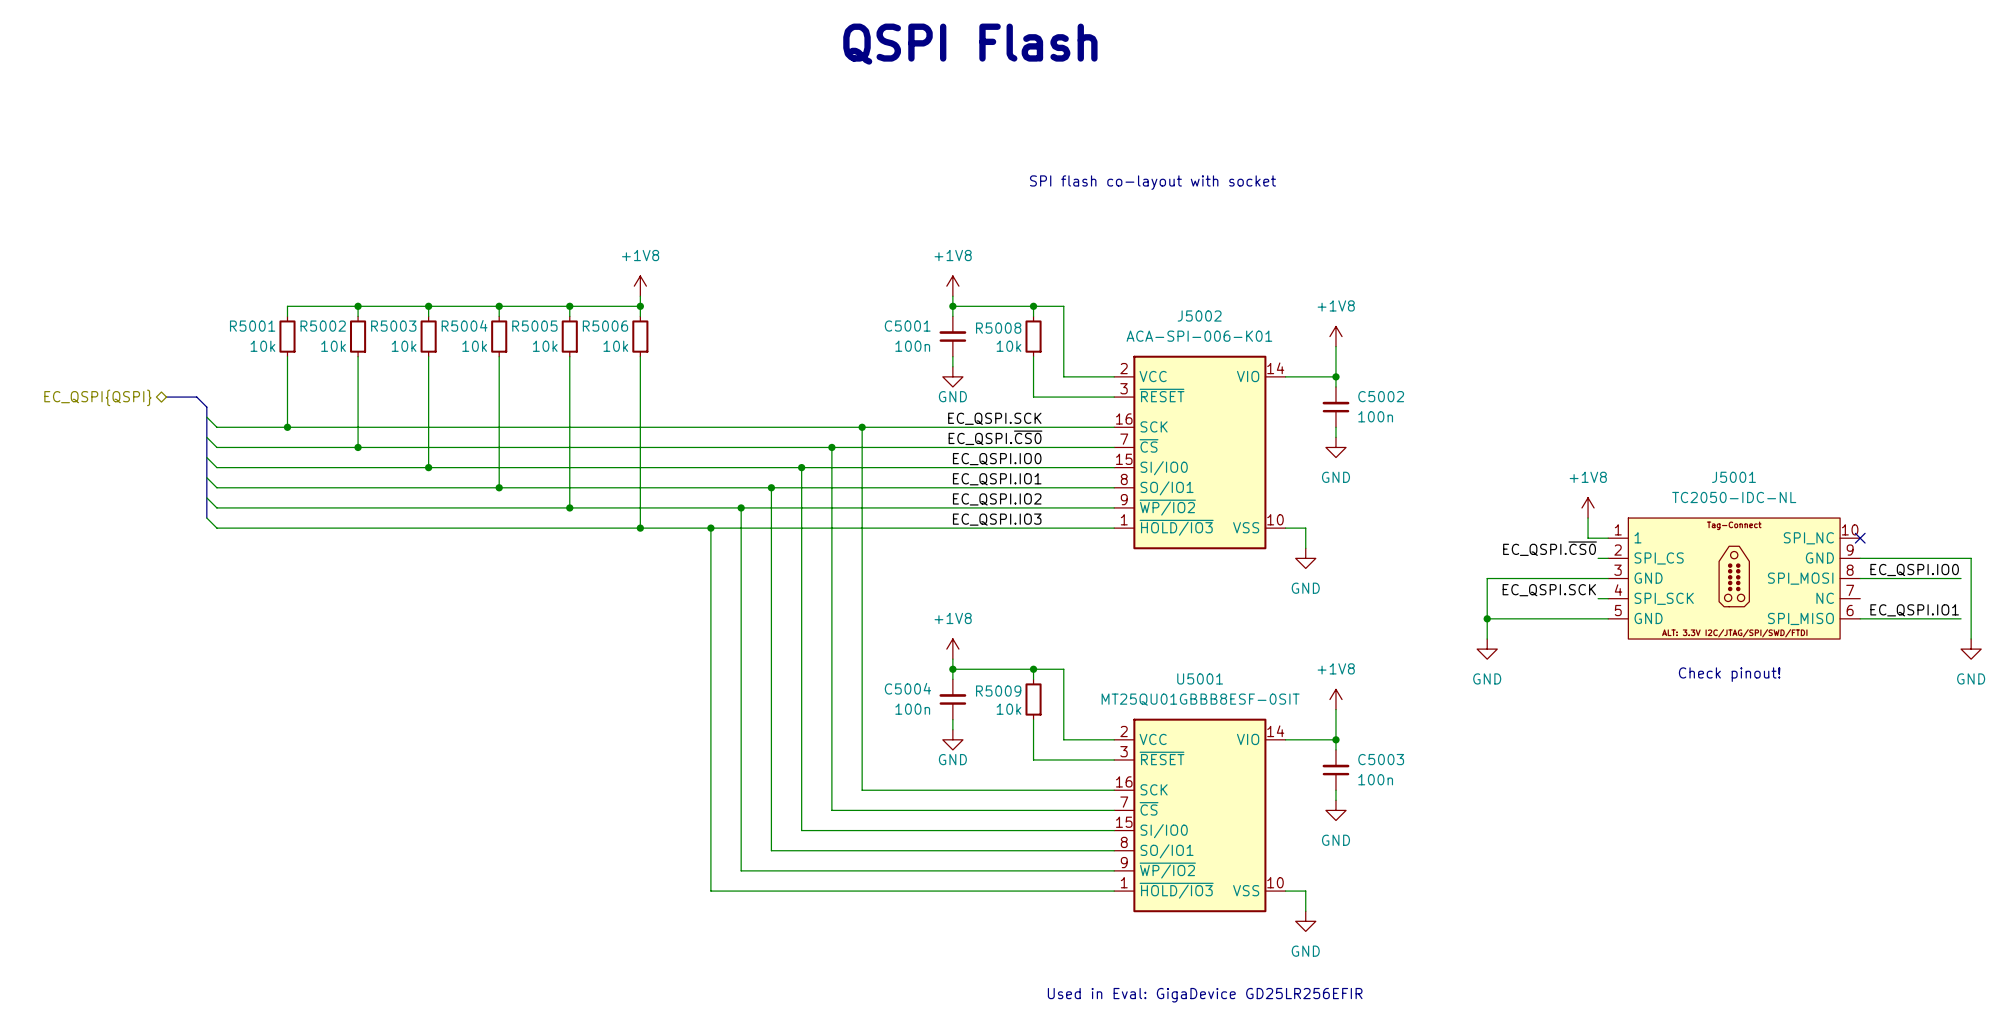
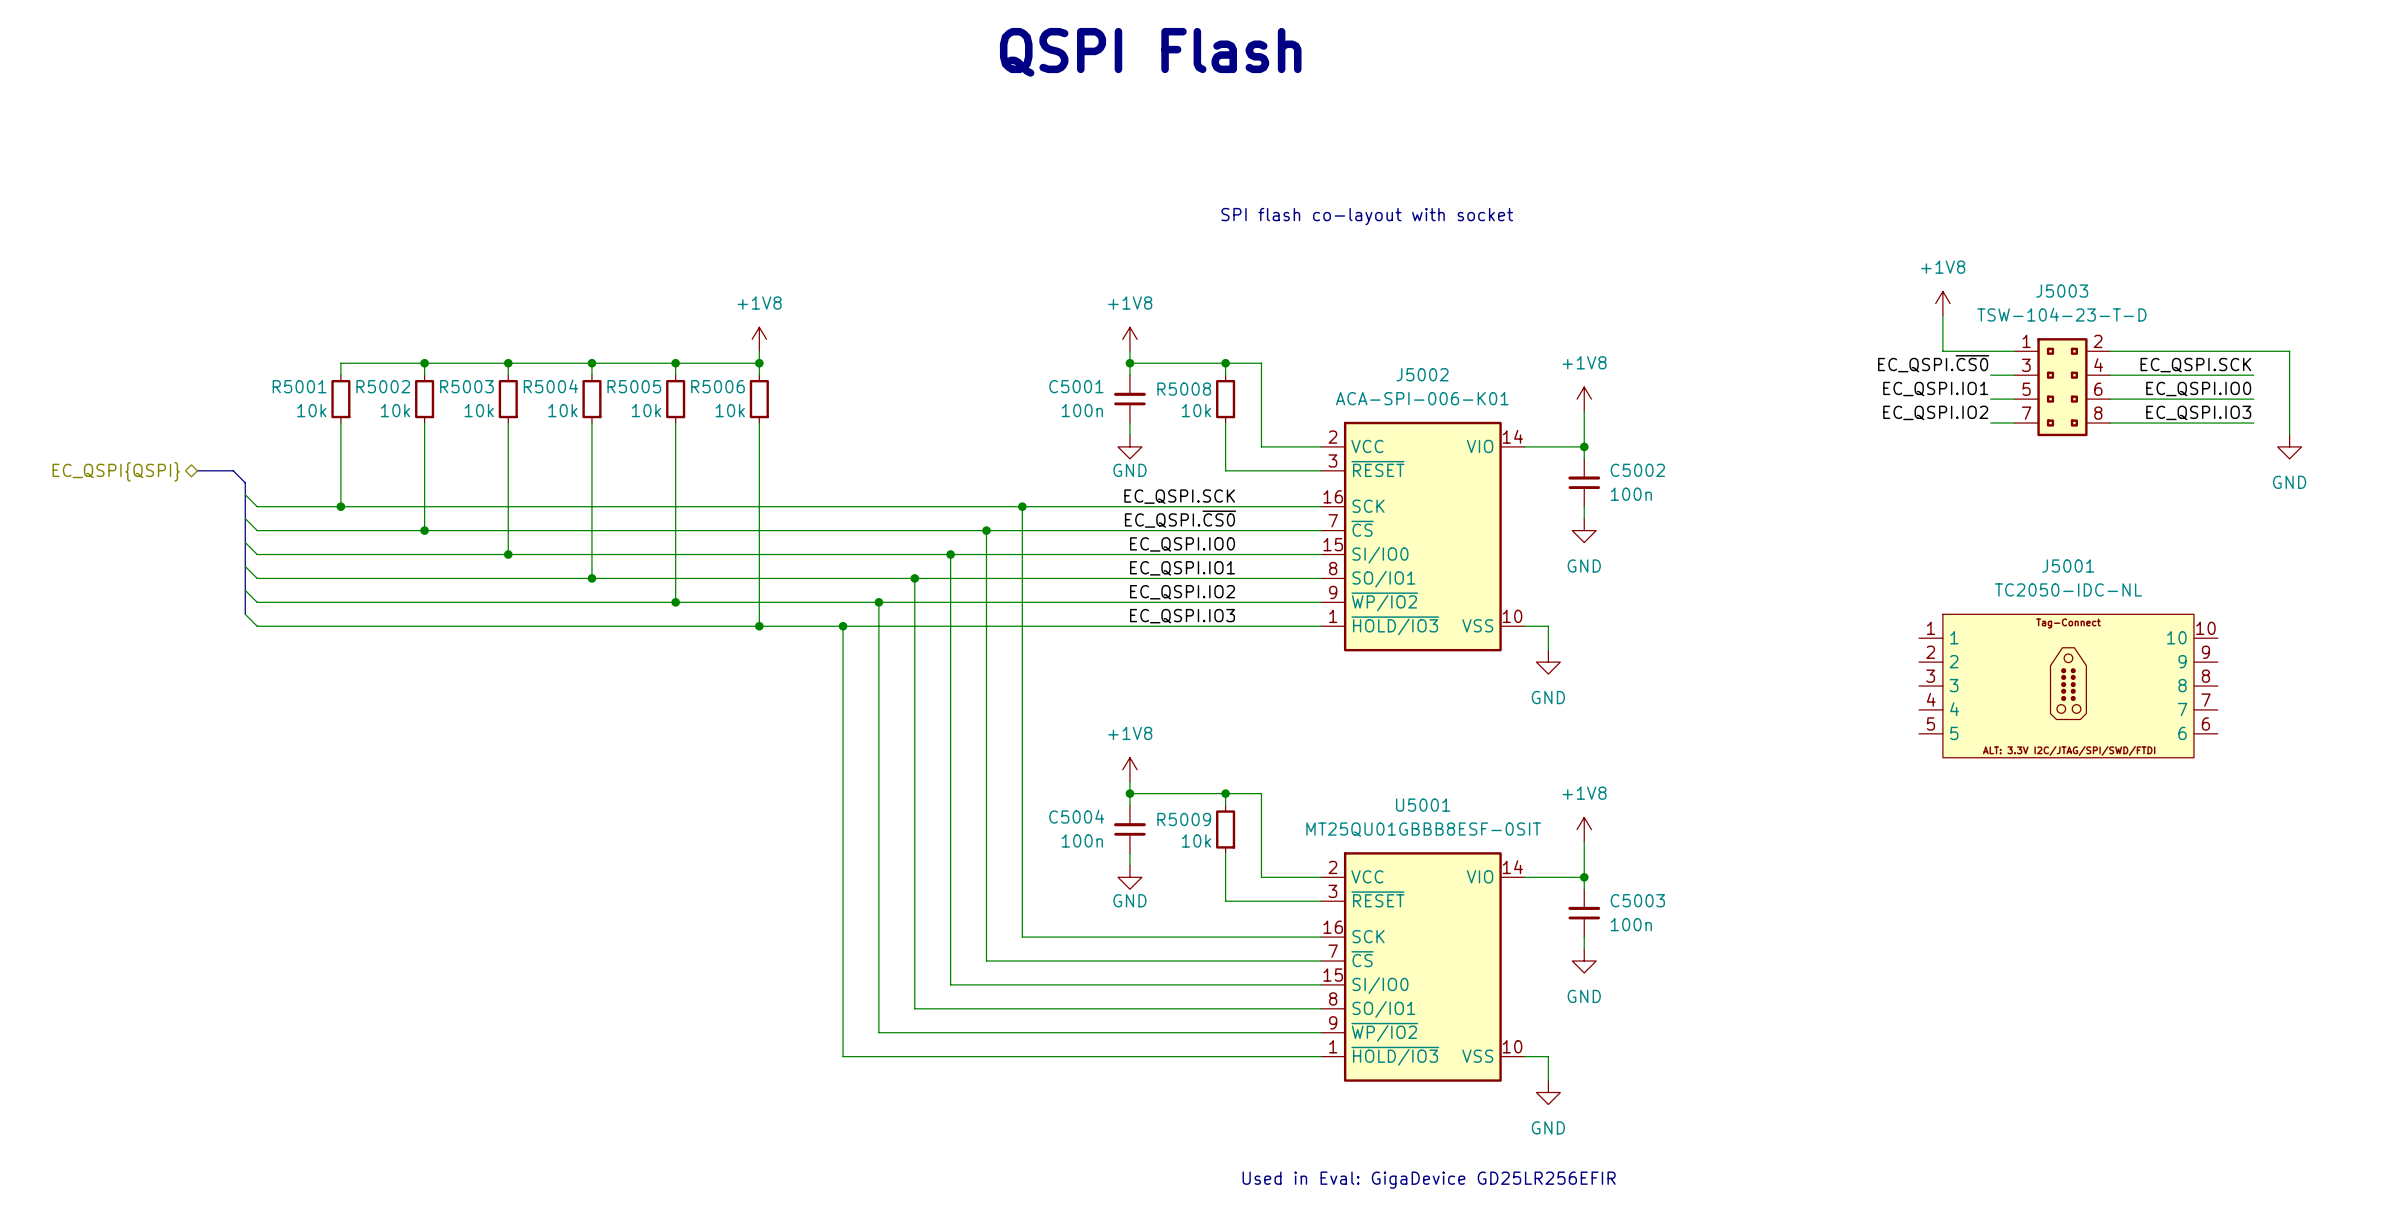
power symbol: none -> +1V8 (1942, 303)
wire: none -> (1942, 315) (1942, 351) (2014, 351)
wire: none -> (2110, 351) (2289, 351) (2289, 434)
label: none -> EC_QSPI.~{CS0} (1933, 363)
label: none -> EC_QSPI.SCK (2195, 365)
wire: none -> (1990, 375) (2014, 375)
wire: none -> (2110, 375) (2253, 375)
J5003: none -> (2062, 387)
label: none -> EC_QSPI.IO1 (1935, 389)
label: none -> EC_QSPI.IO0 (2198, 389)
wire: none -> (1990, 399) (2014, 399)
wire: none -> (2110, 399) (2253, 399)
label: none -> EC_QSPI.IO2 (1935, 412)
label: none -> EC_QSPI.IO3 (2198, 412)
wire: none -> (1990, 423) (2014, 423)
wire: none -> (2110, 423) (2253, 423)
power symbol: none -> GND (2289, 446)
power symbol: +1V8 (1588, 507) -> none
wire: (1588, 518) (1588, 538) (1608, 538) -> none
J5001 symbol: [1608, 518, 1861, 640] -> [1919, 614, 2218, 758]
no-connect mark: (1860, 538) -> none
label: EC_QSPI.~{CS0} (1550, 548) -> none
wire: (1598, 558) (1608, 558) -> none
wire: (1860, 558) (1971, 558) (1971, 639) -> none
label: EC_QSPI.IO0 (1914, 570) -> none
wire: (1608, 578) (1487, 578) (1487, 639) -> none
wire: (1860, 578) (1961, 578) -> none
label: EC_QSPI.SCK (1549, 590) -> none
wire: (1598, 598) (1608, 598) -> none
label: EC_QSPI.IO1 (1914, 610) -> none
wire: (1487, 618) (1608, 618) -> none
junction: (1487, 618) -> none
wire: (1860, 618) (1961, 618) -> none
power symbol: GND (1487, 649) -> none
power symbol: GND (1971, 649) -> none
text: Check pinout! (1729, 674) -> none

